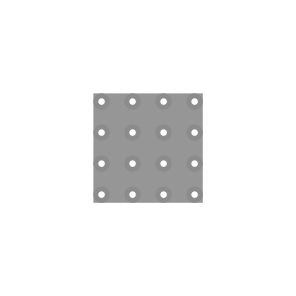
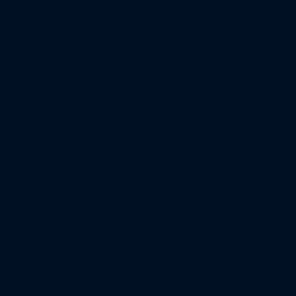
part: (148, 148) -> none

